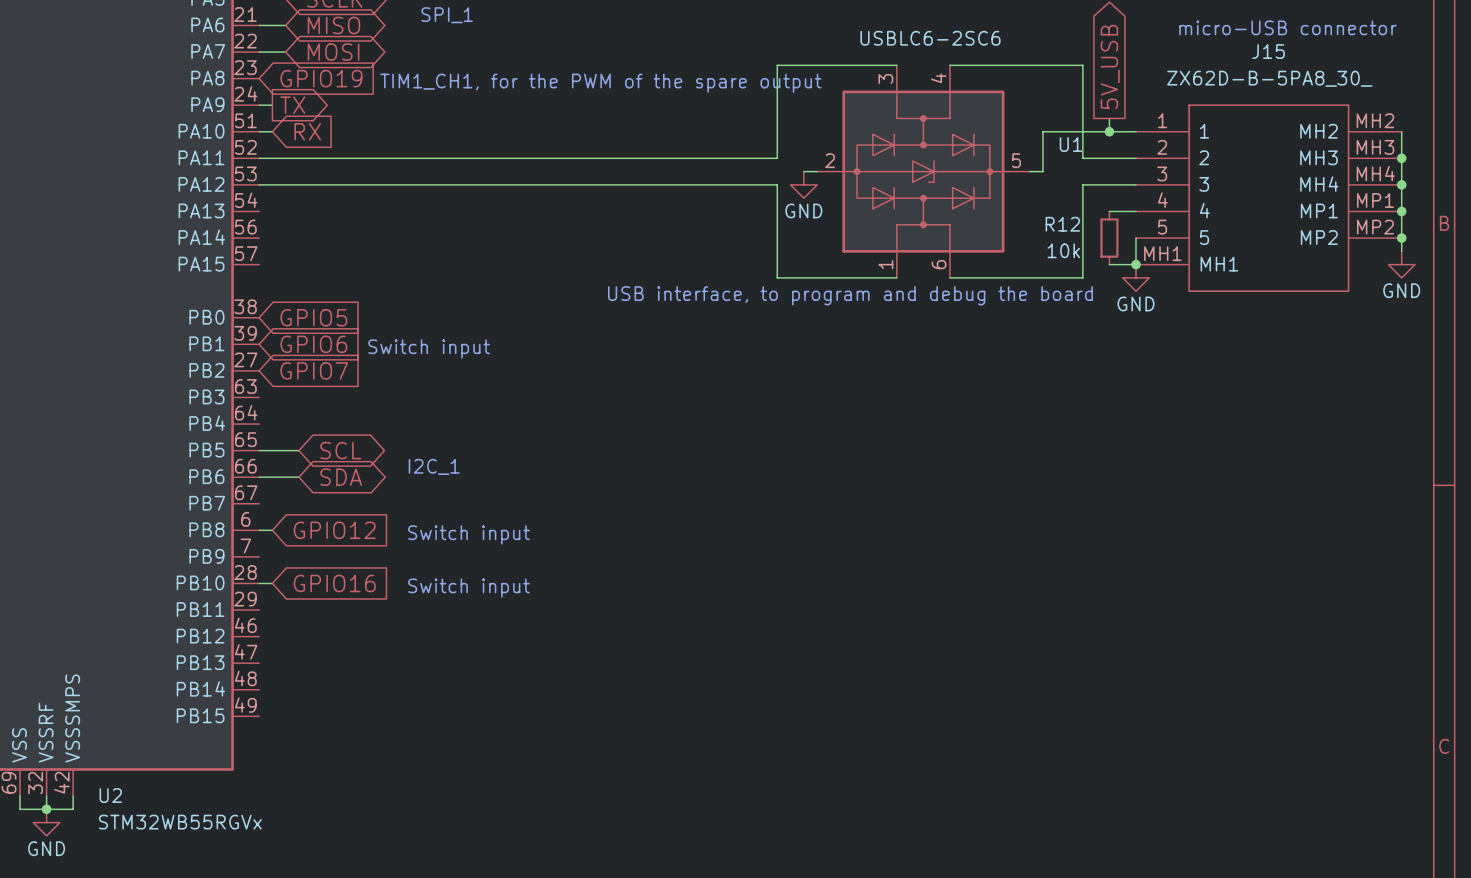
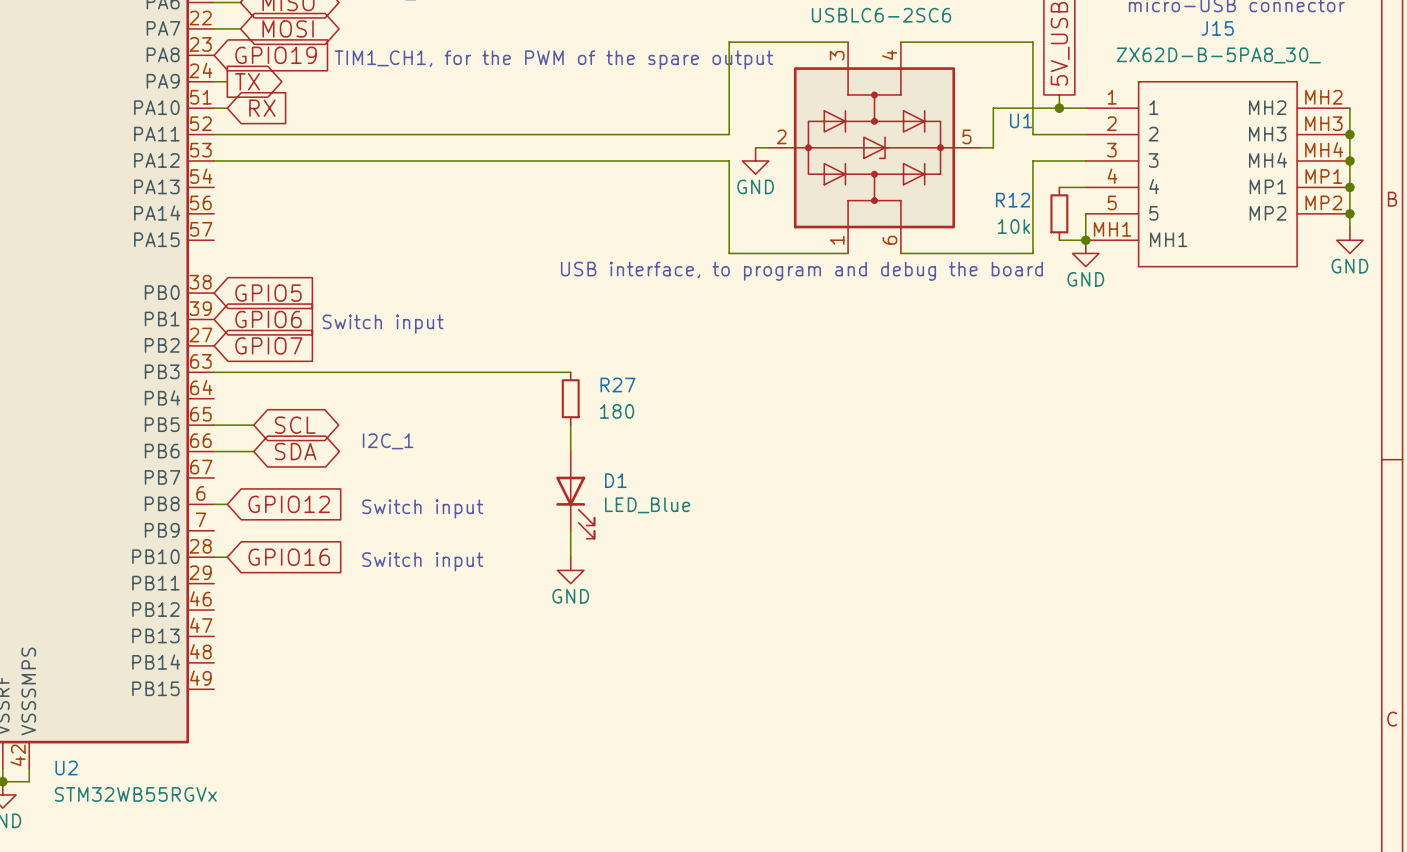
wire: none -> (214, 372) (570, 372)
R27: none -> 180 (570, 398)
wire: none -> (570, 425) (570, 451)
D1: none -> LED_Blue (575, 495)
wire: none -> (570, 530) (570, 557)
power symbol: none -> GND (570, 570)

